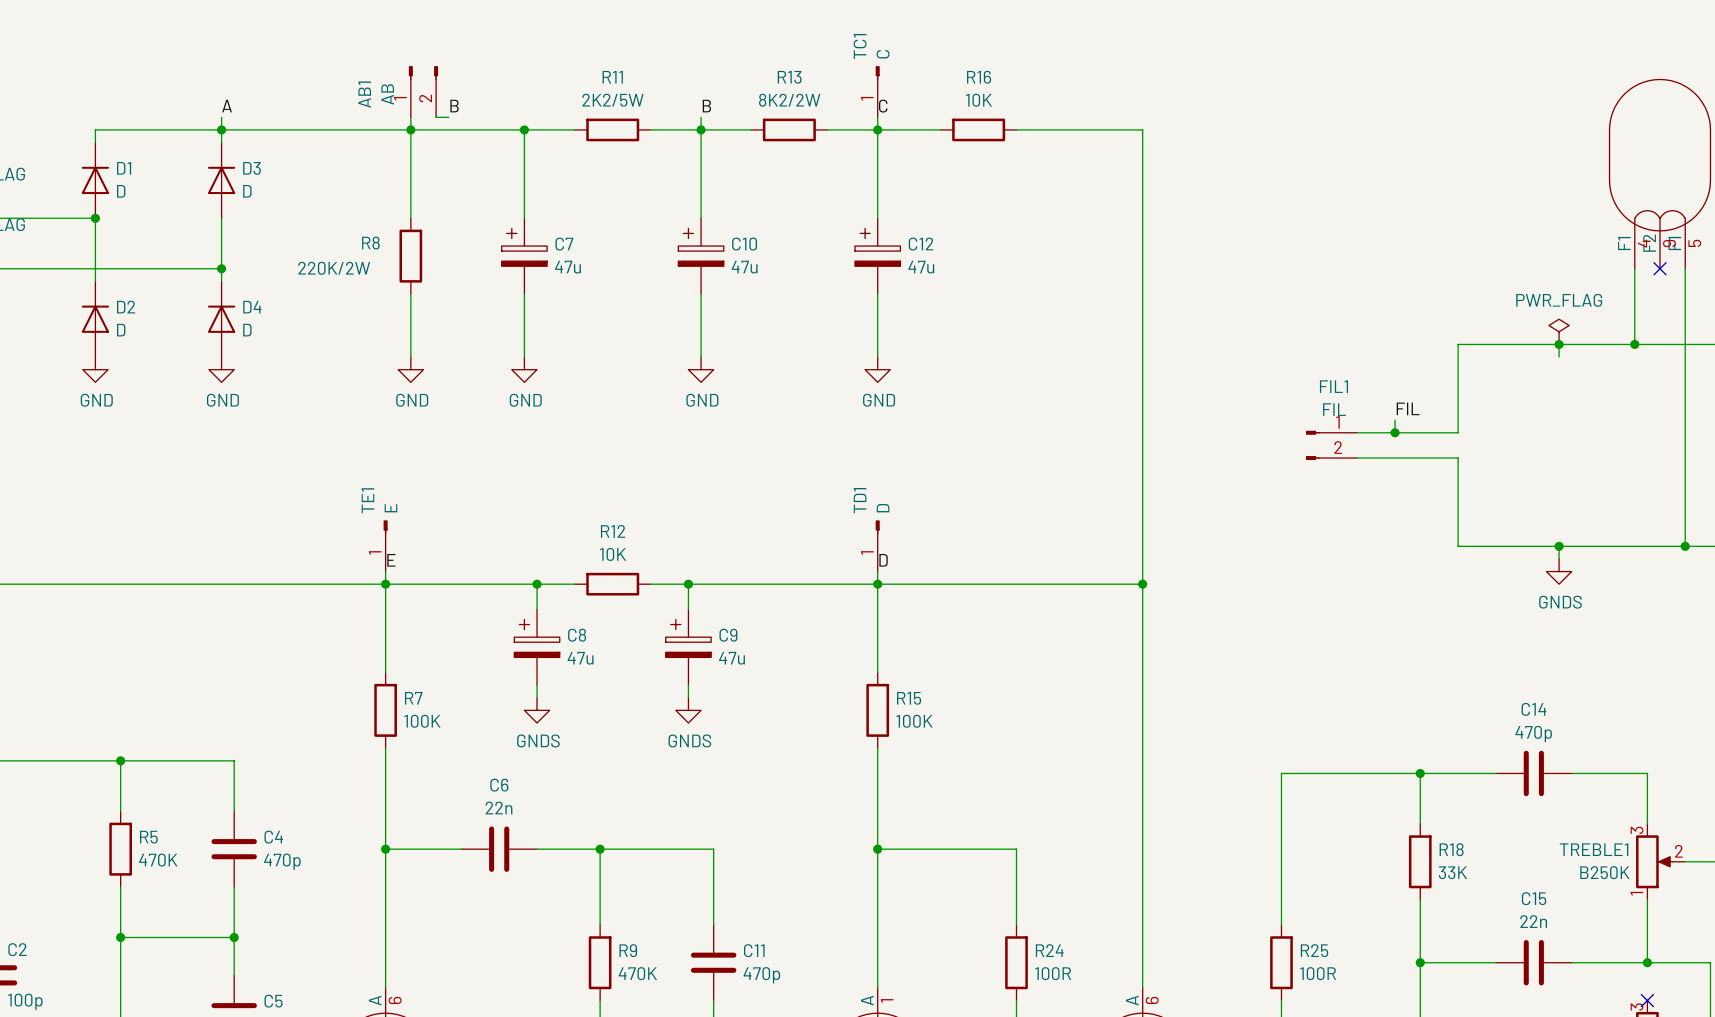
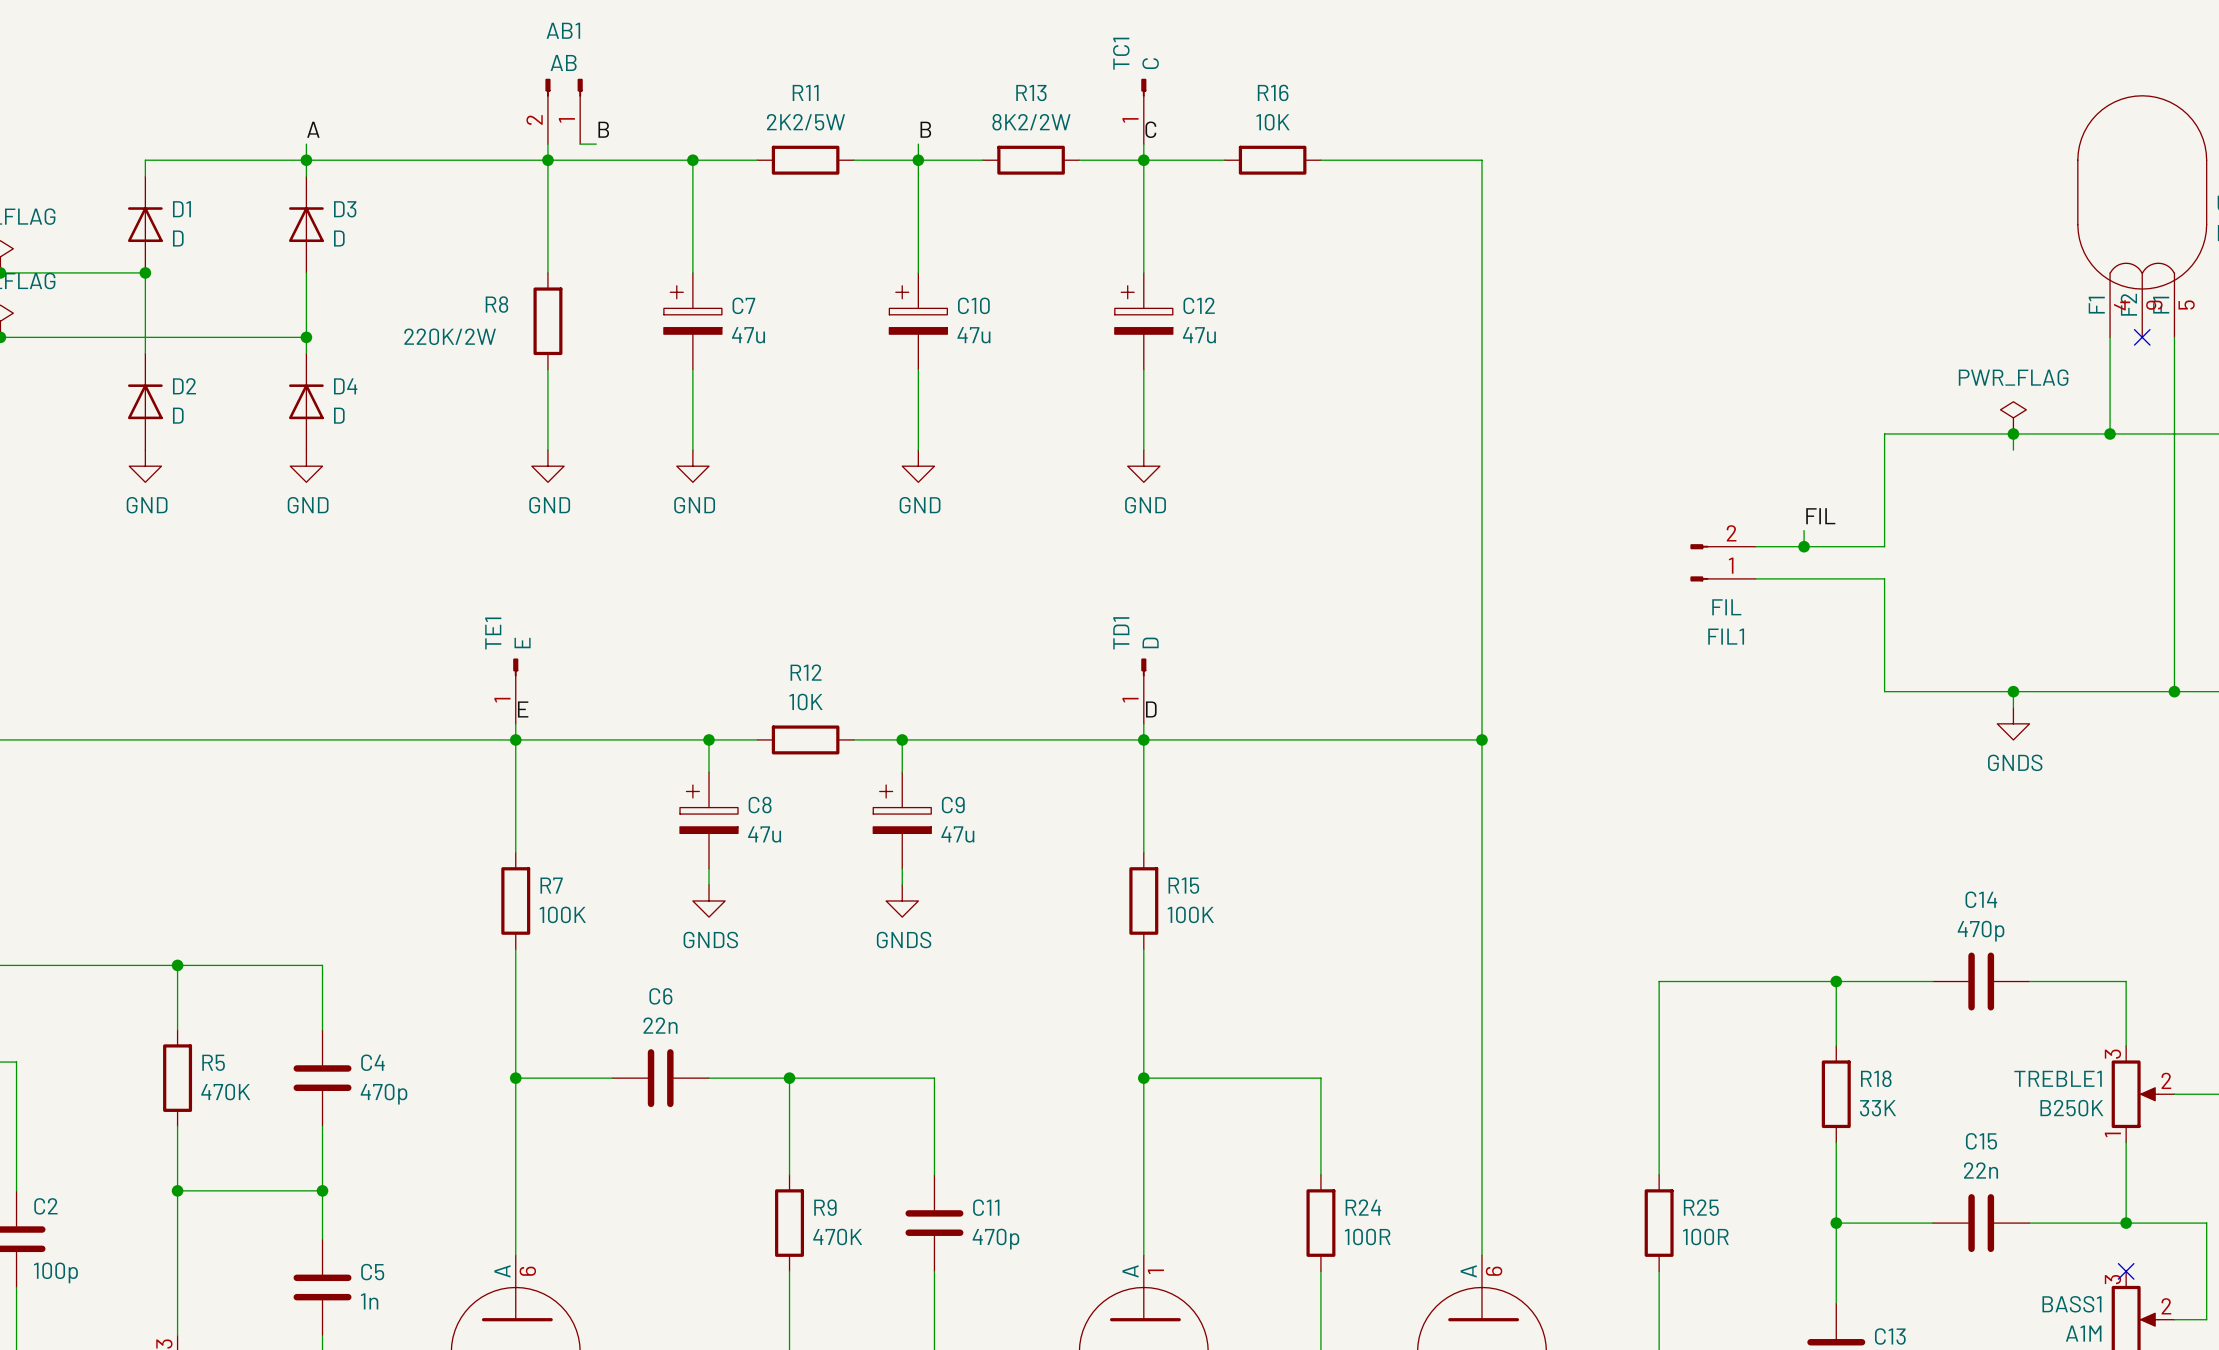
AB1 flip: as is (423, 73) -> left-right (564, 87)
AB1 name position: AB1 (364, 94) -> AB1 (563, 30)
AB1 value position: AB (387, 94) -> AB (563, 62)
FIL1 flip: as is (1313, 445) -> up-down (1699, 562)

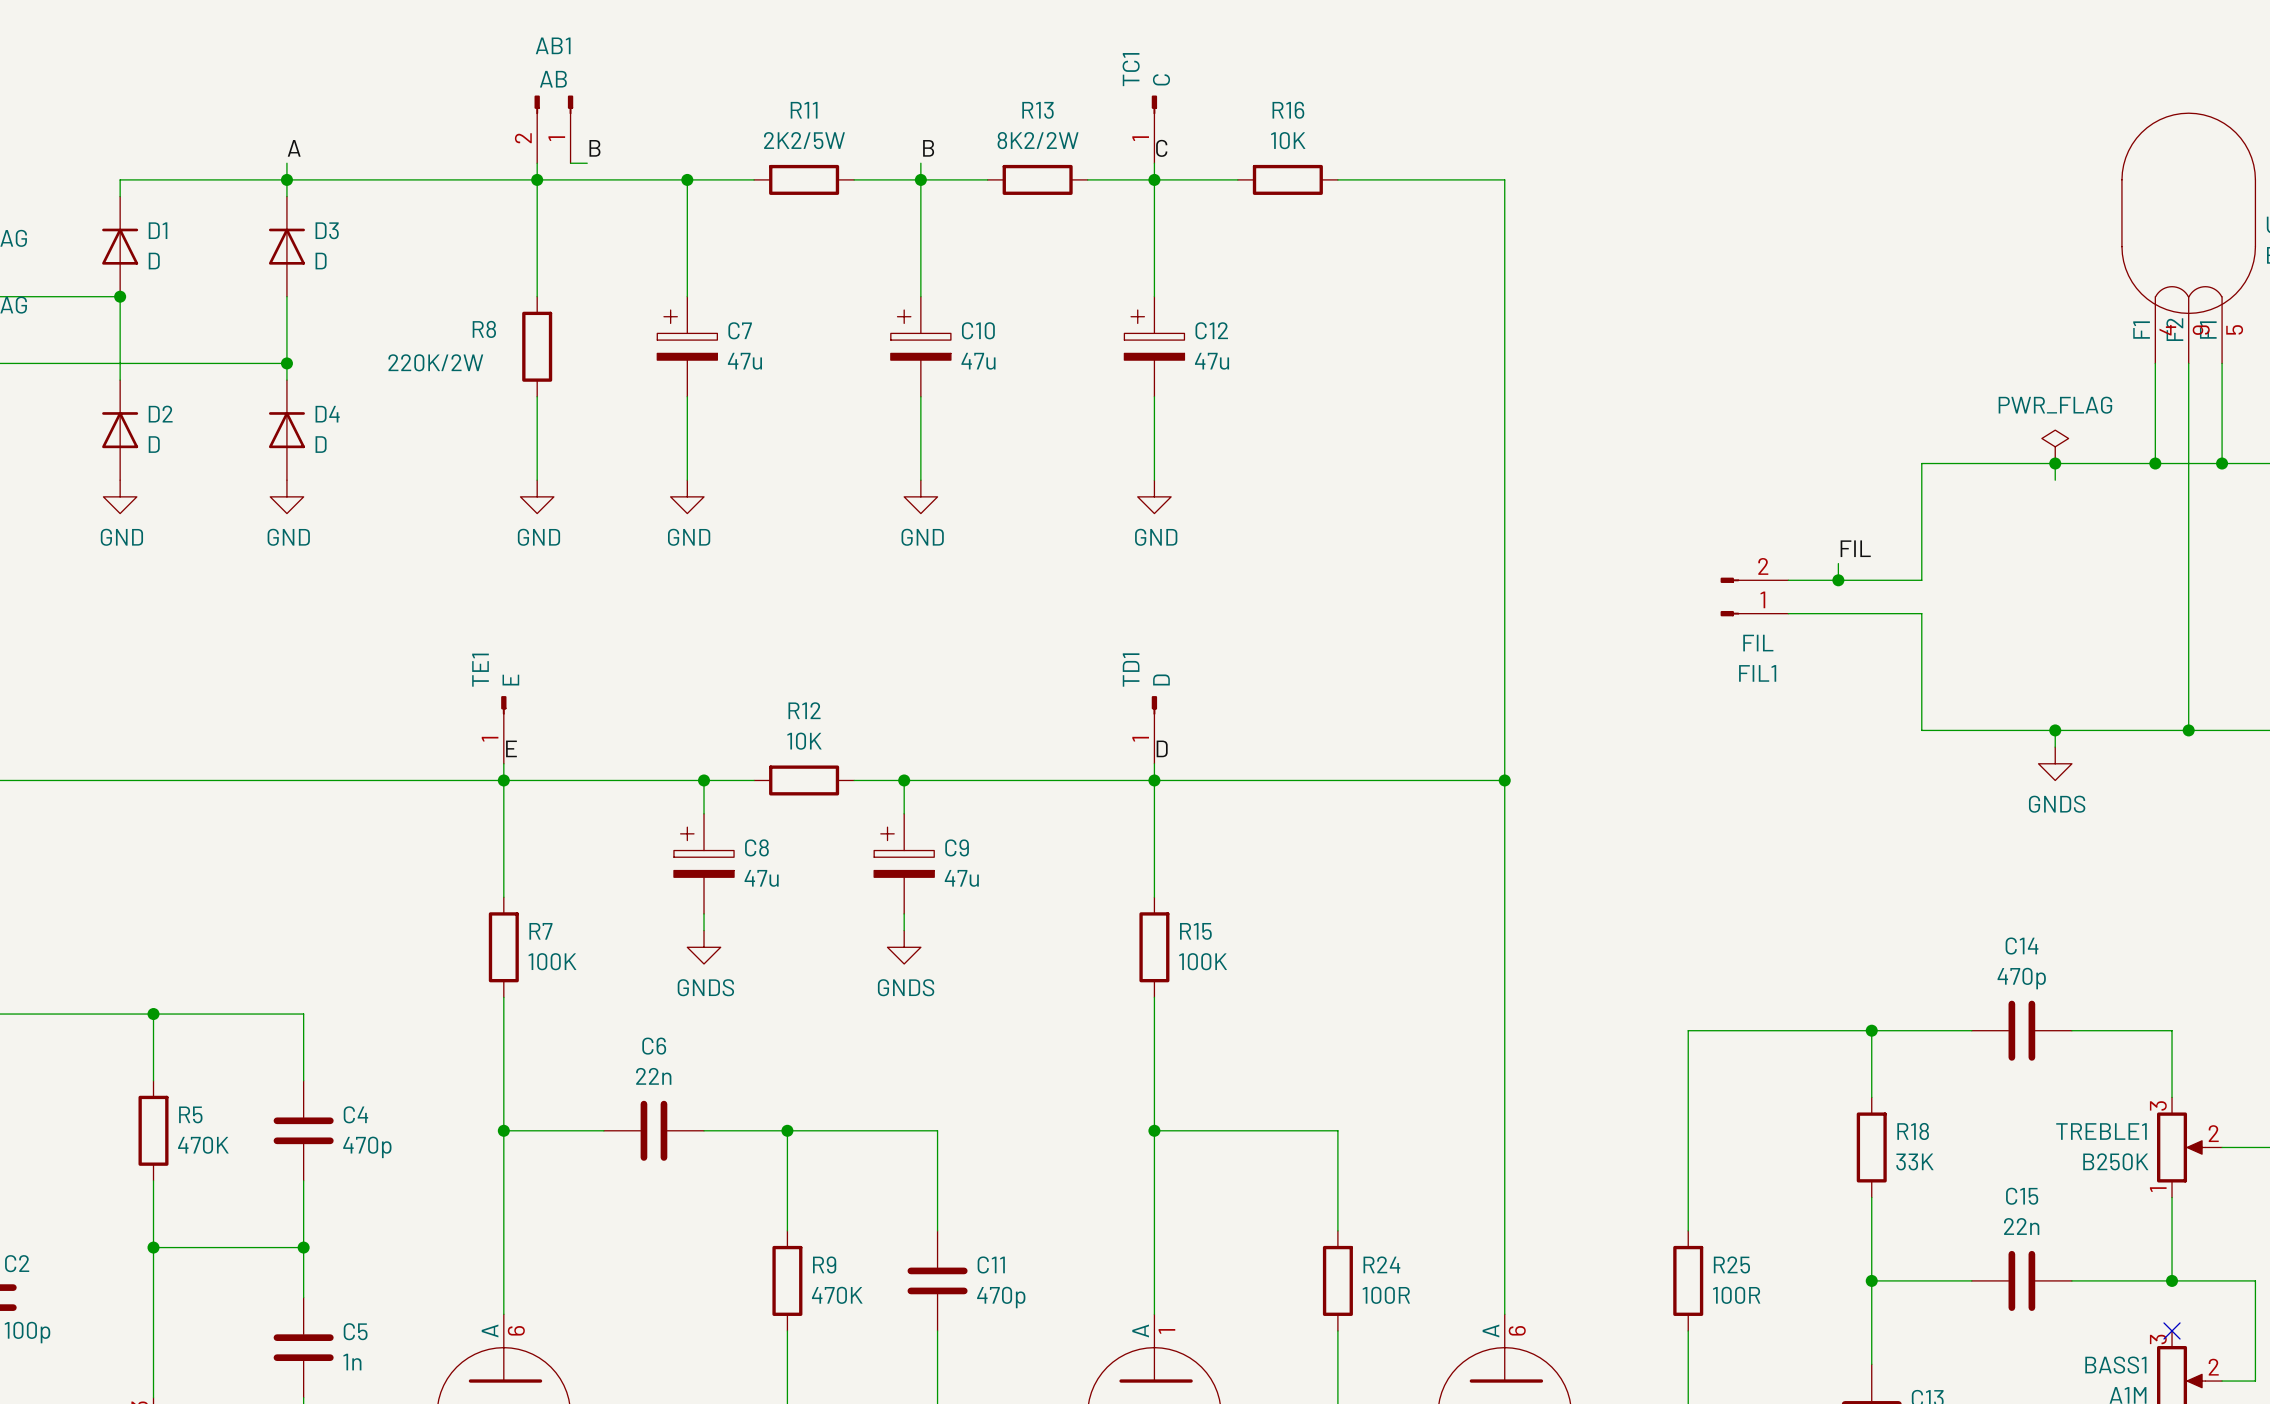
wire: none -> (2188, 363) (2188, 730)
no-connect mark: (2142, 337) -> none
wire: (2174, 433) (2174, 691) -> none
junction: none -> (2222, 463)
junction position: (2174, 691) -> (2188, 730)

